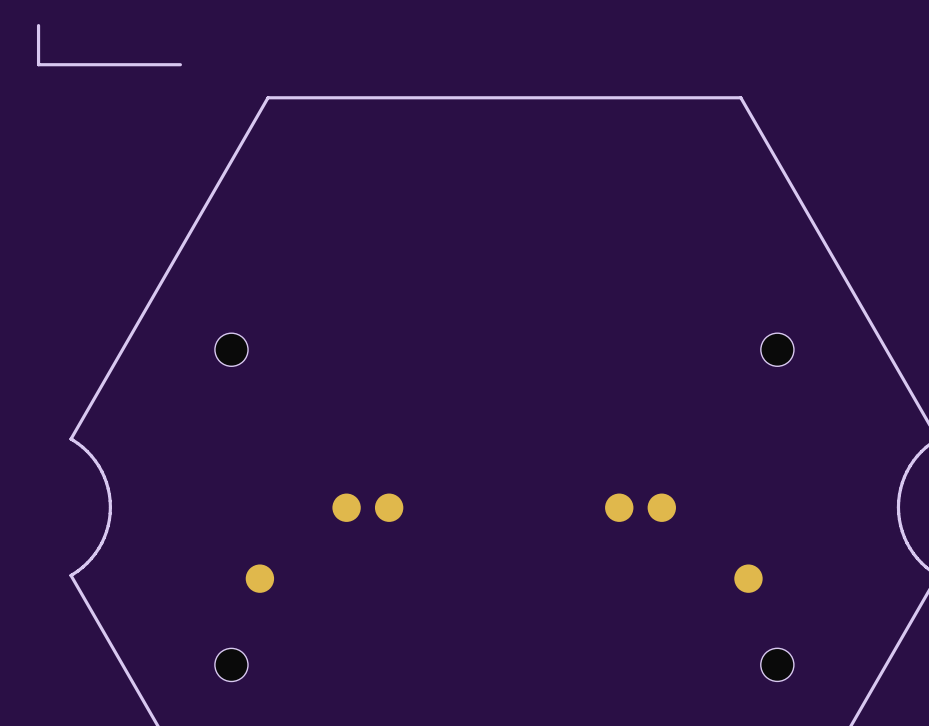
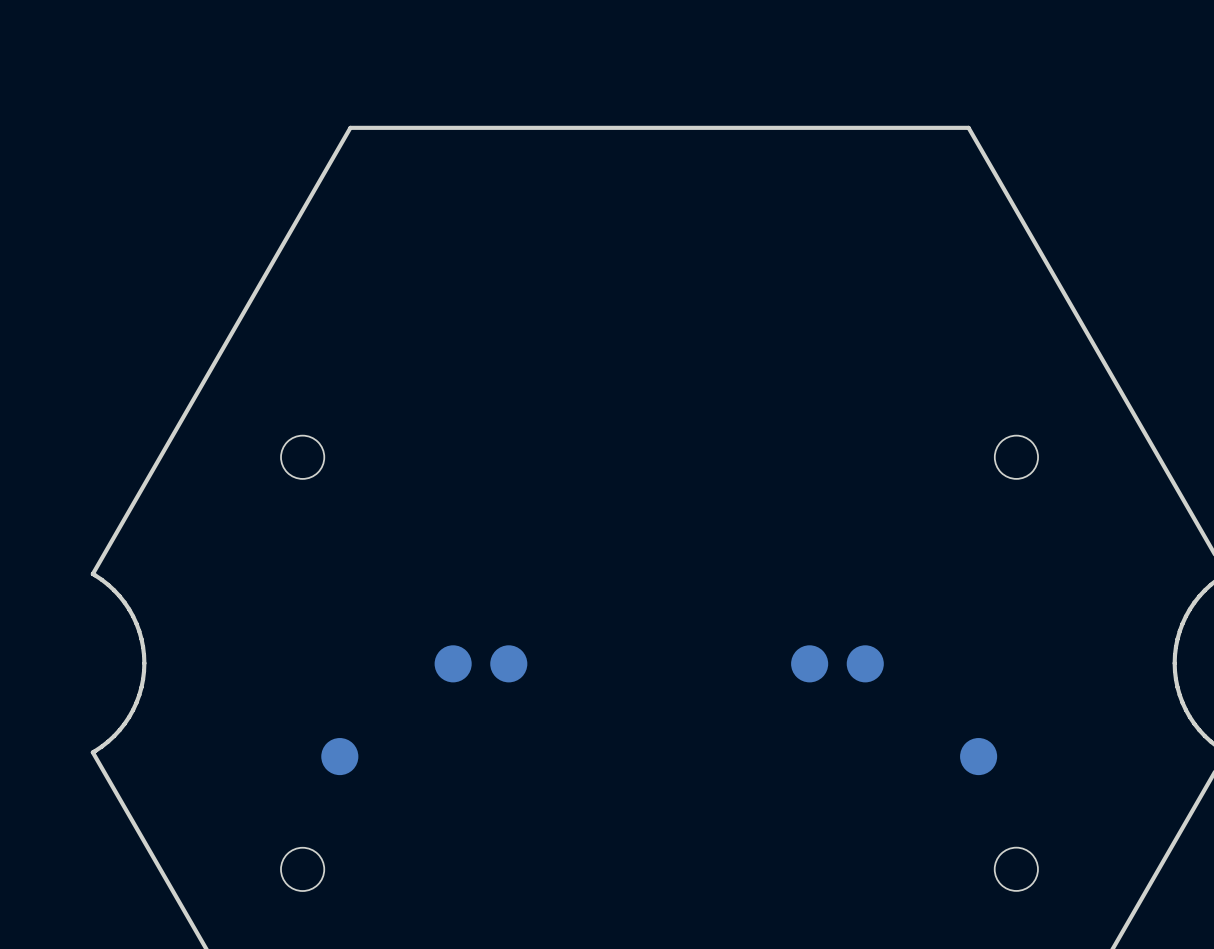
board edge: (38, 25) (38, 64) (180, 64) -> none

